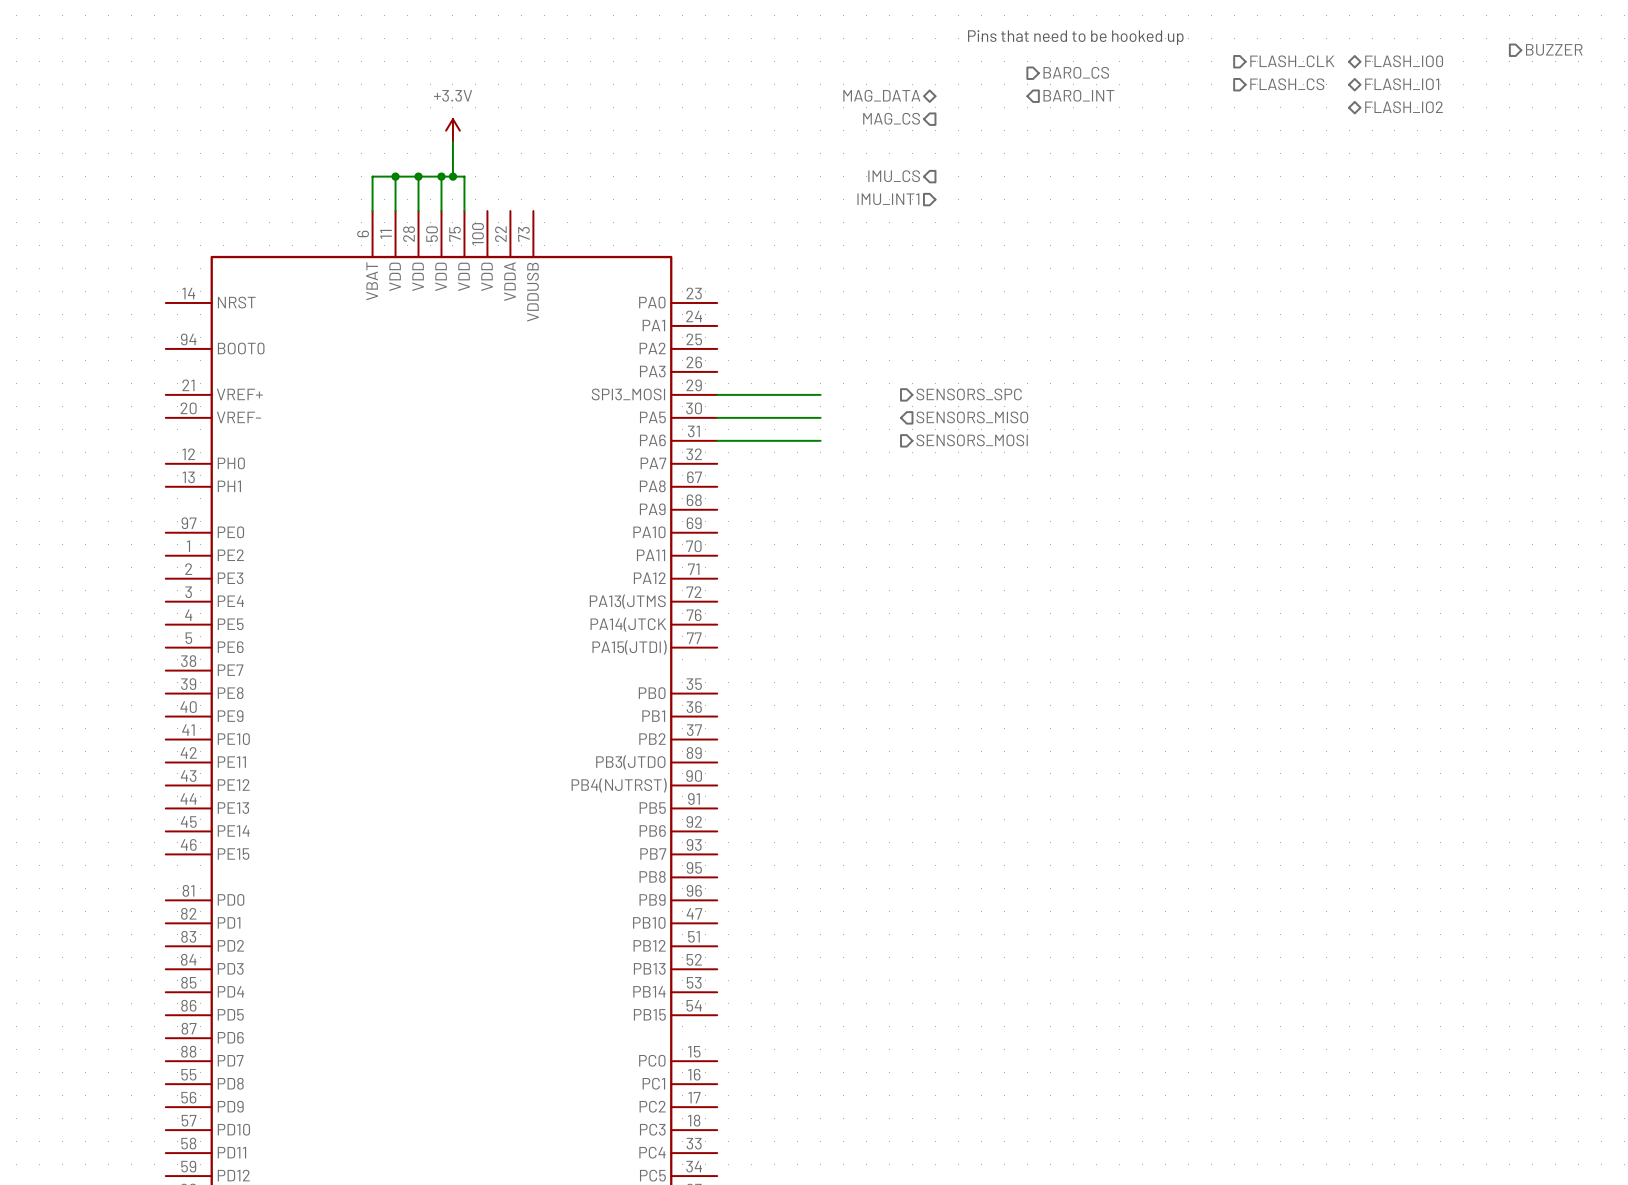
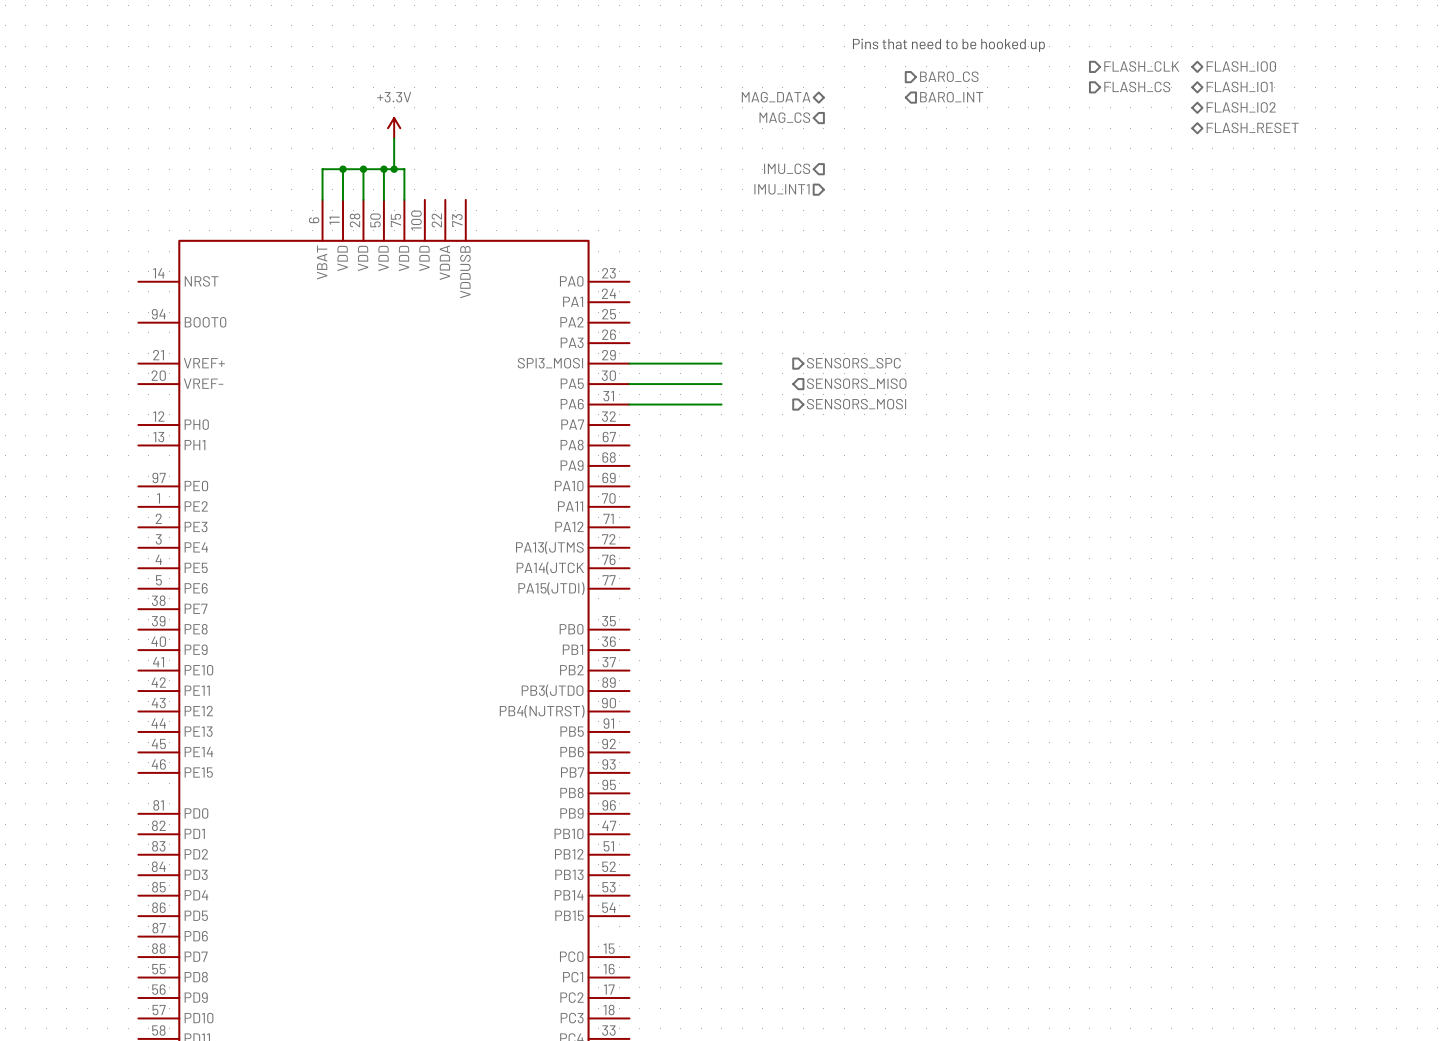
hierarchical label: BUZZER (1554, 49) -> none
hierarchical label: none -> FLASH_RESET (1252, 127)

